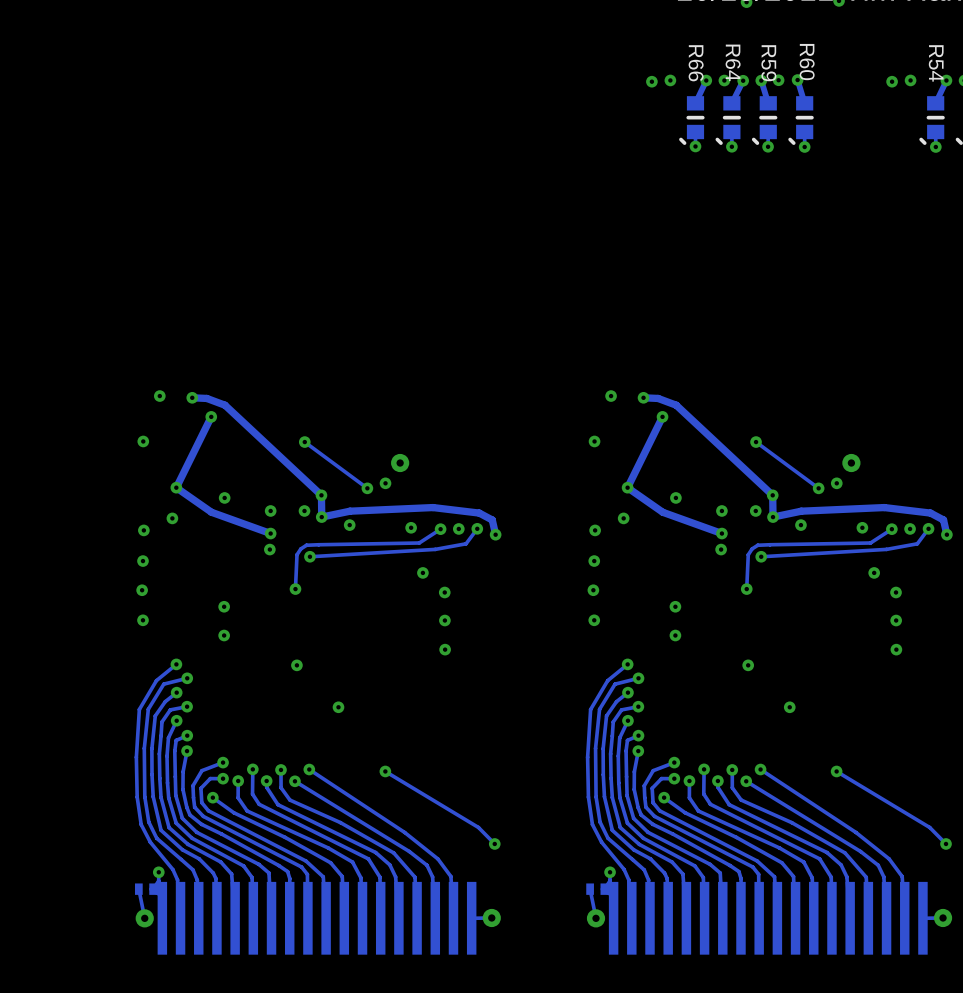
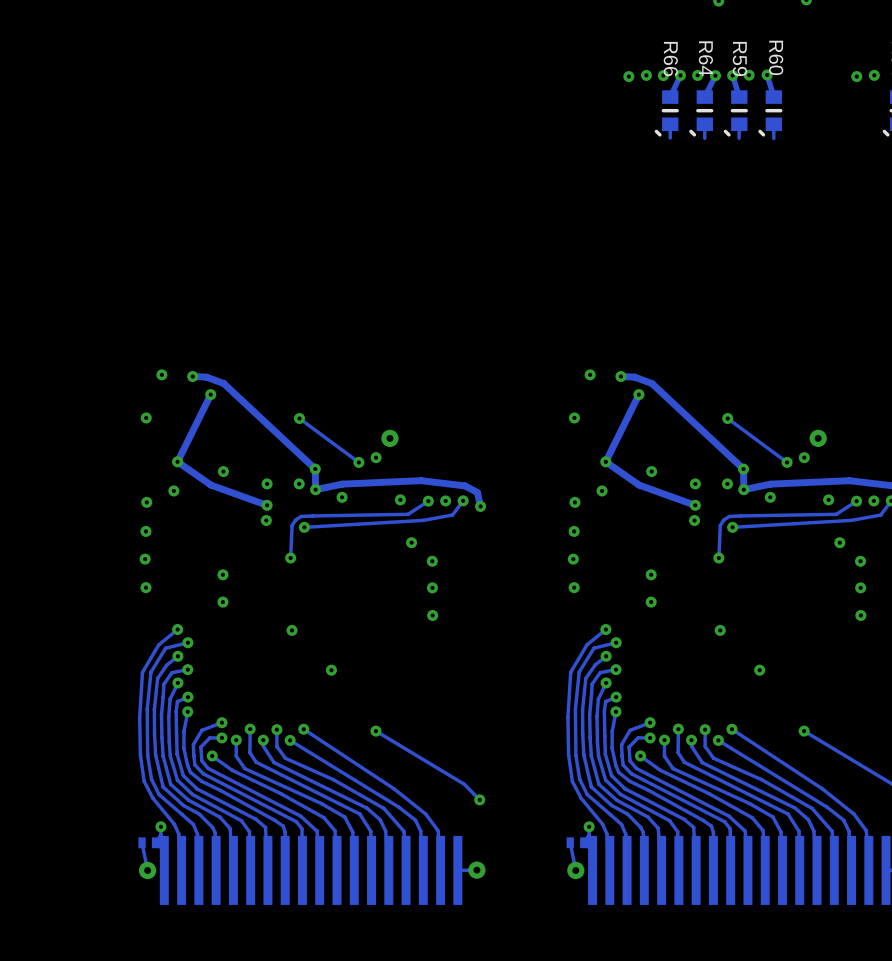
via: none -> (663, 75)
via: (695, 146) -> none
via: (731, 146) -> none
via: (768, 146) -> none
via: (804, 146) -> none

